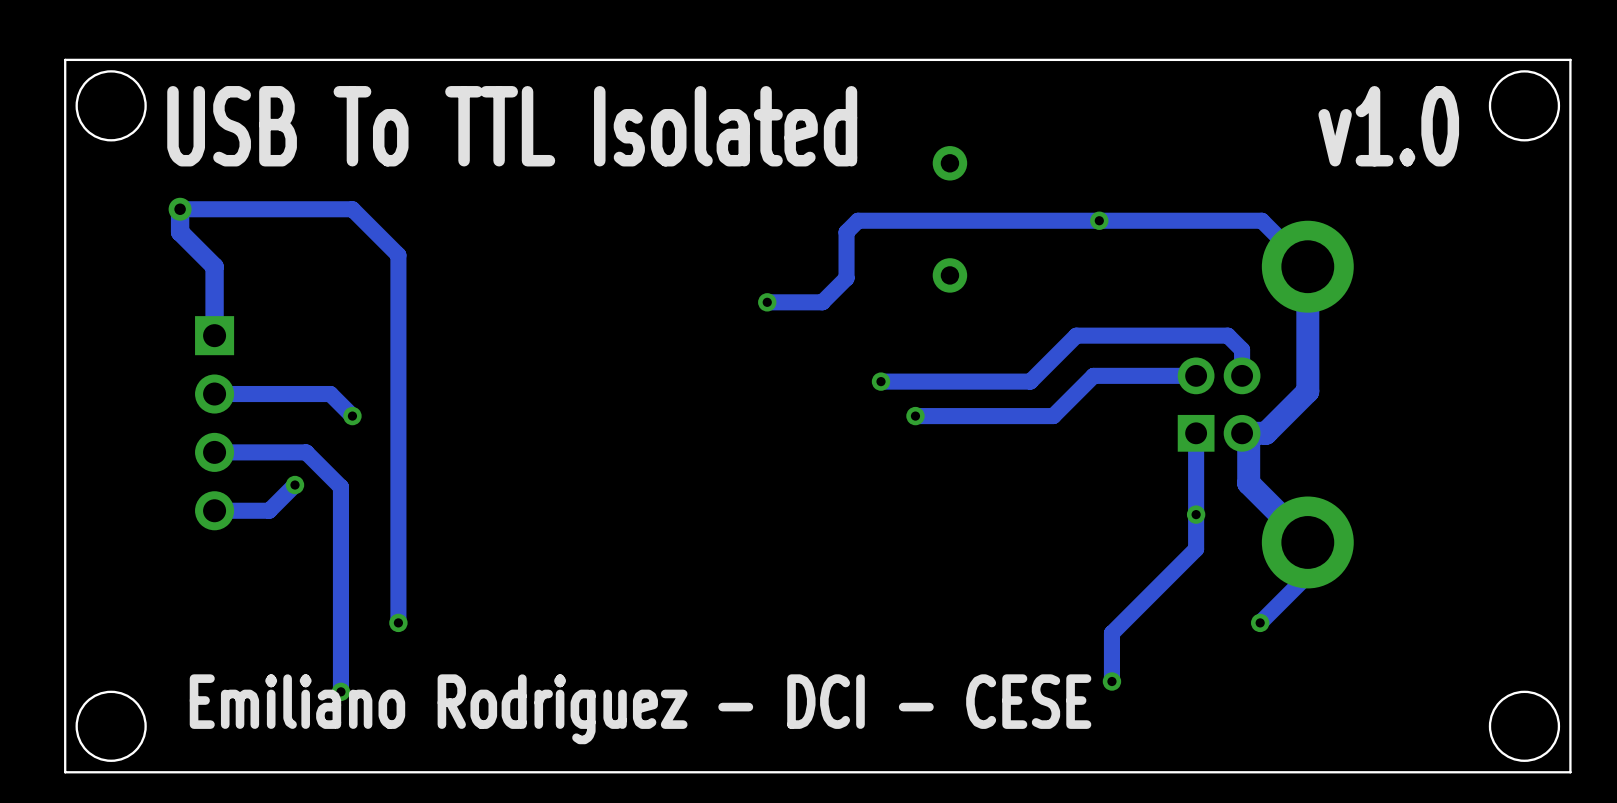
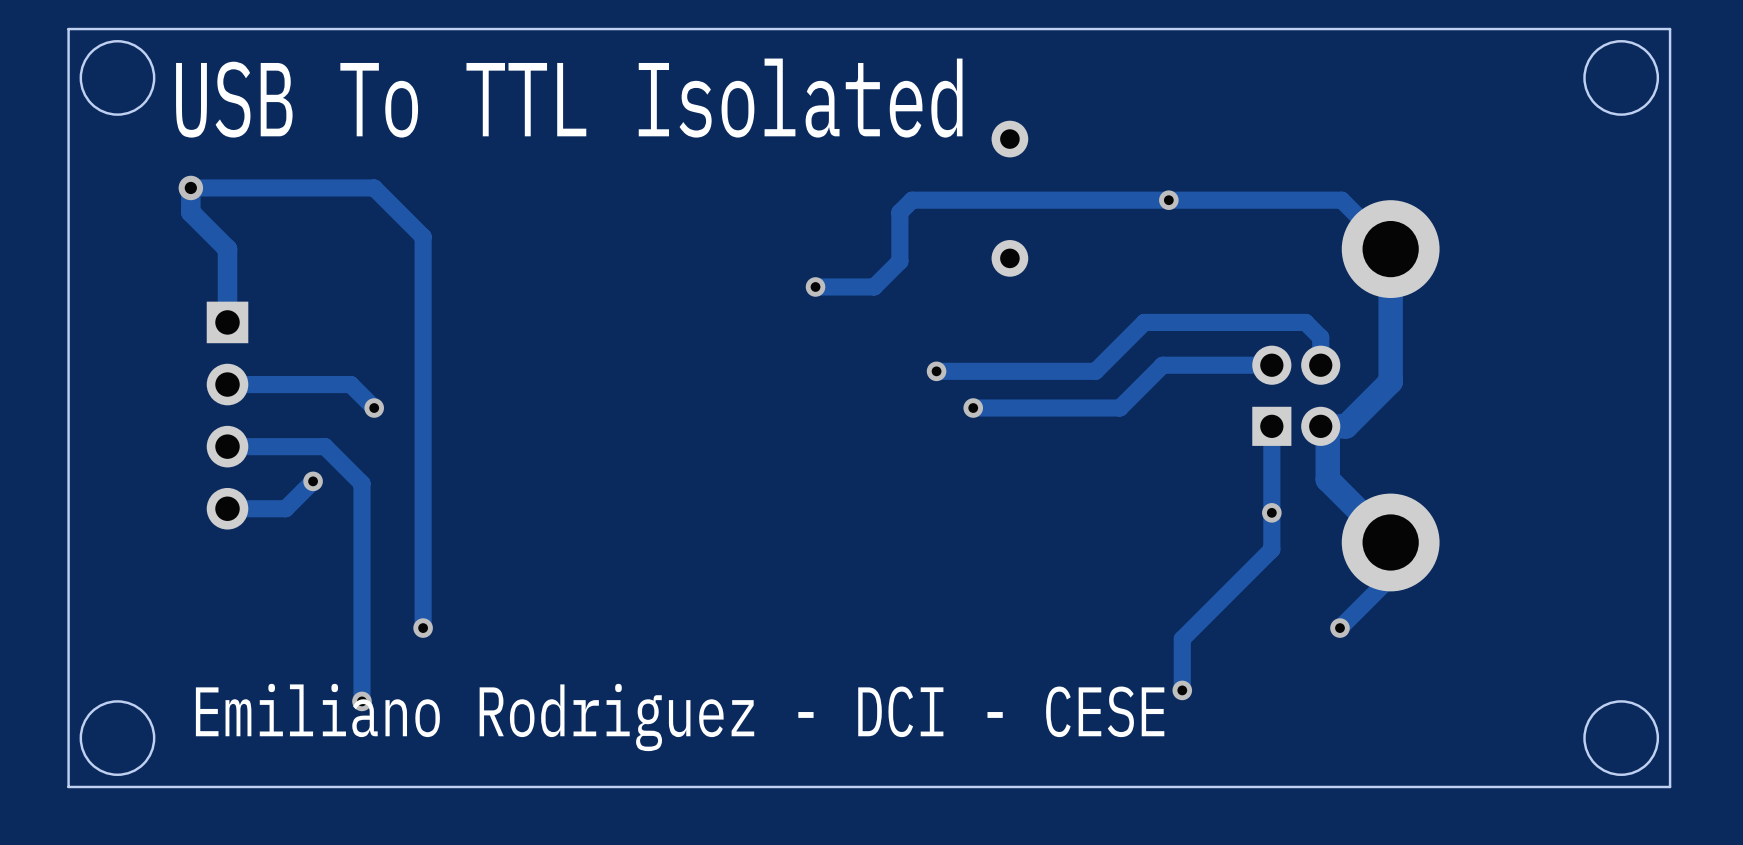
text: USB To TTL Isolated v1.0 (813, 126) -> USB To TTL Isolated (569, 98)

